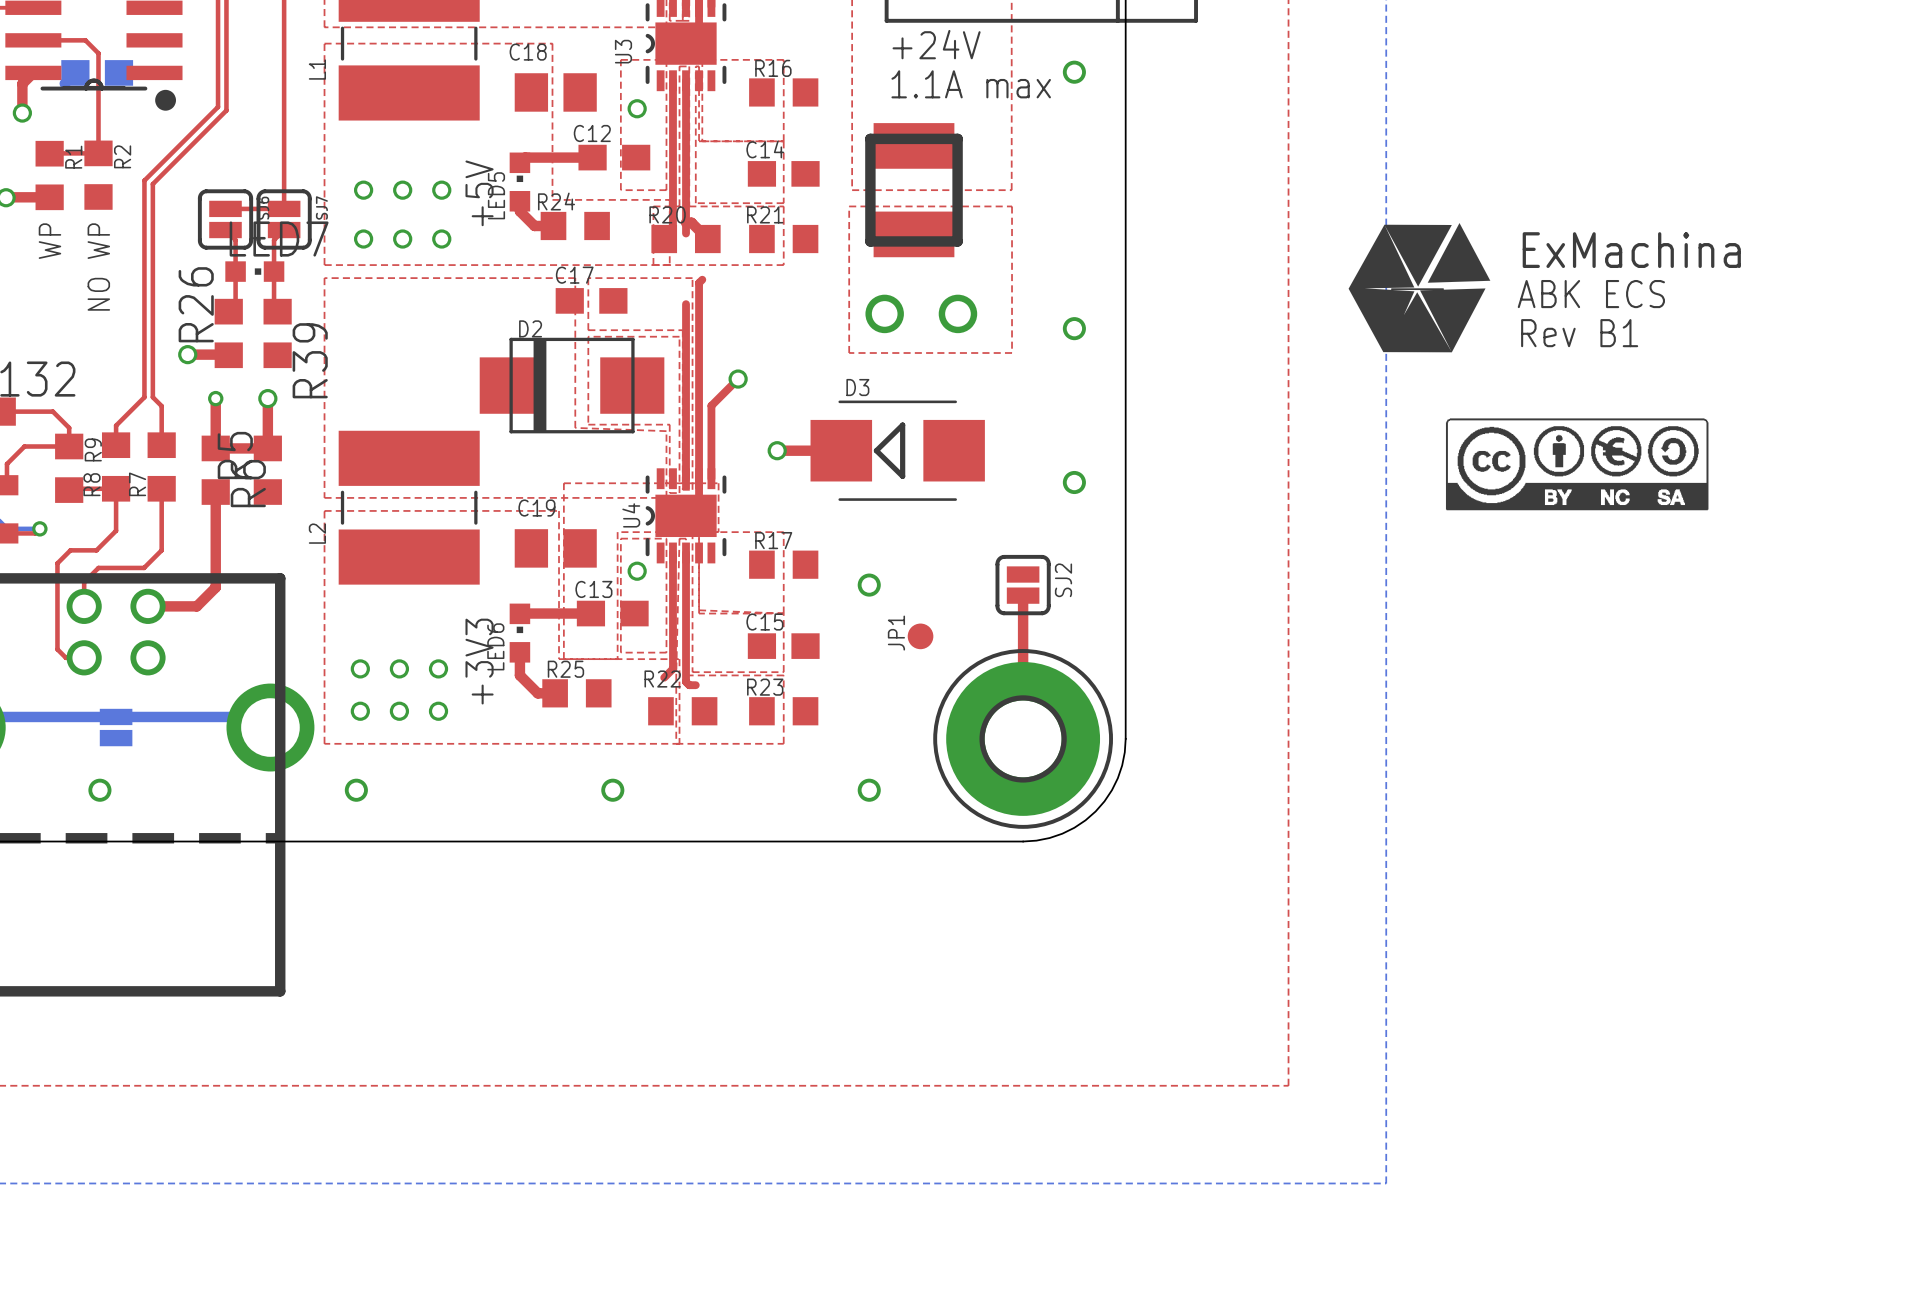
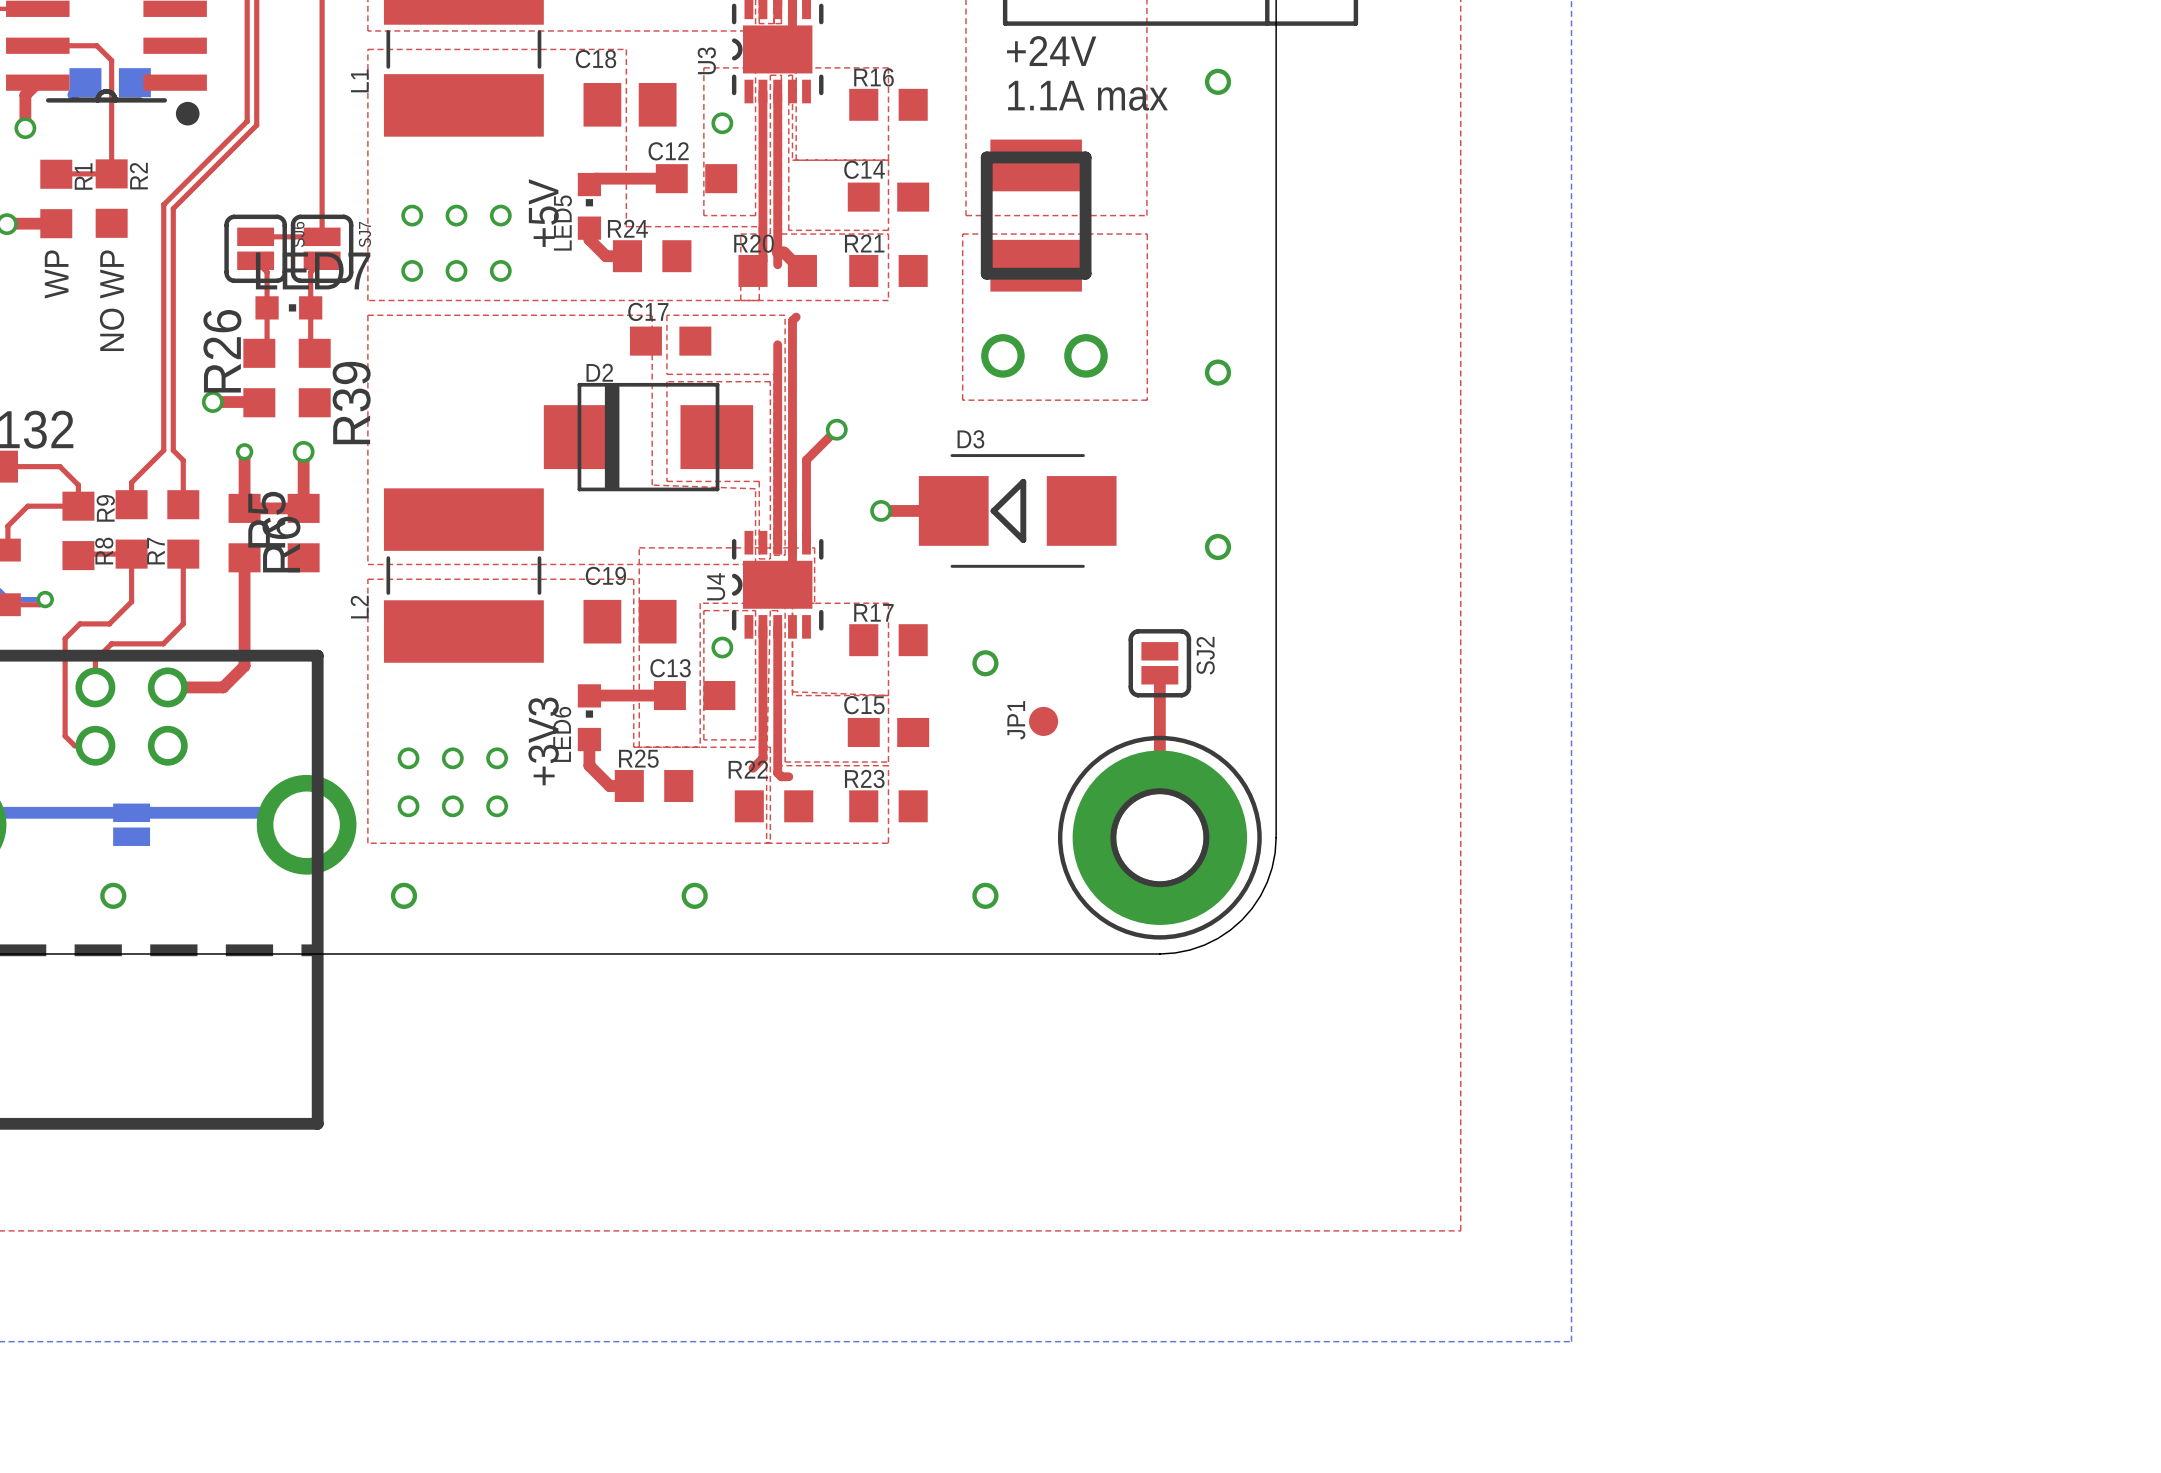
drawing: [1348, 223, 1491, 353] -> none
text: ABK ECS (1591, 294) -> none
text: Rev B1 (1579, 333) -> none
drawing: [1445, 418, 1709, 511] -> none

